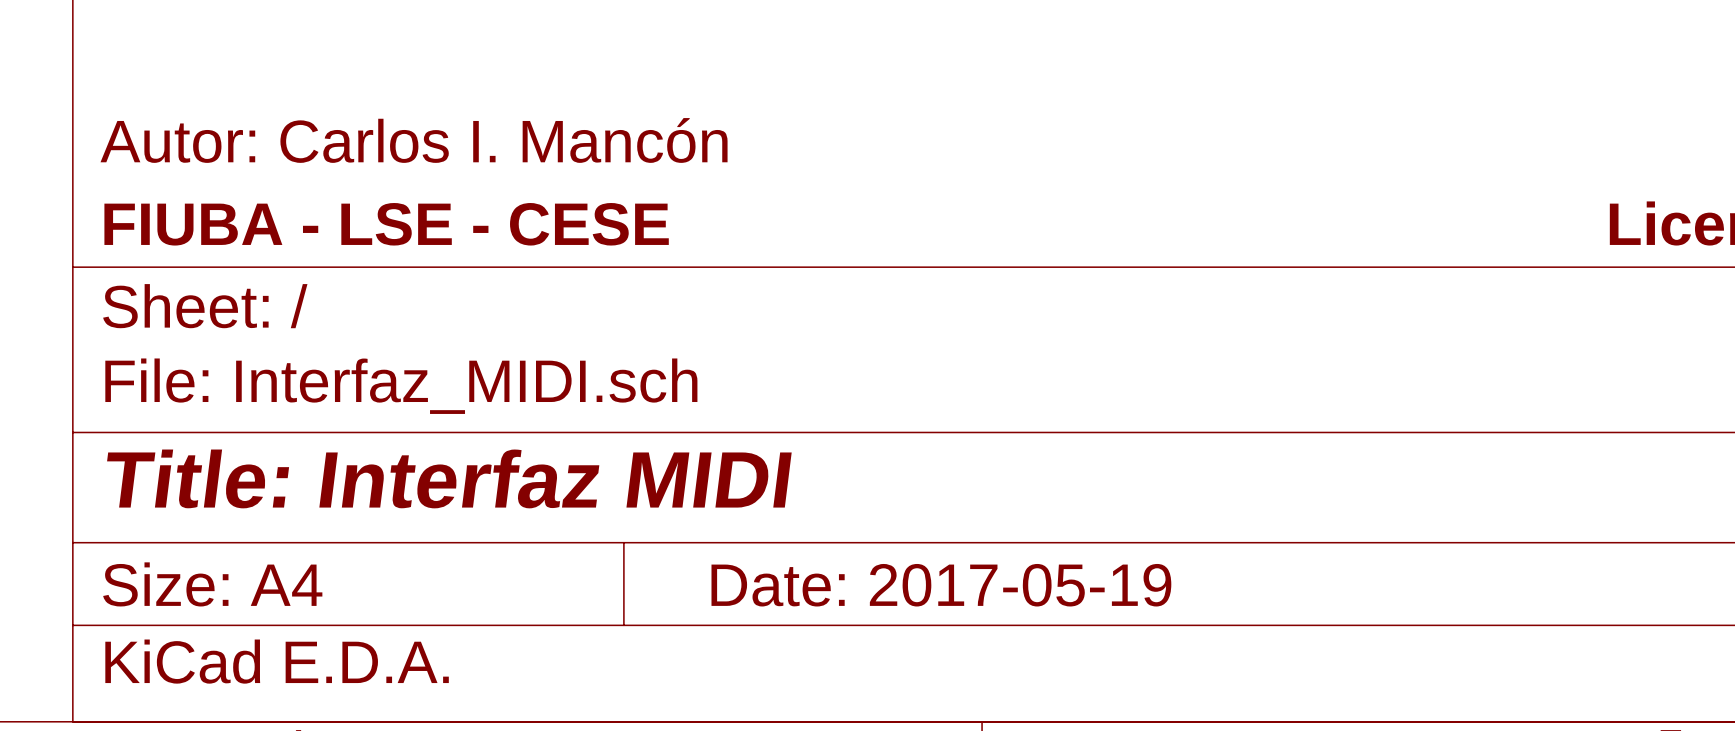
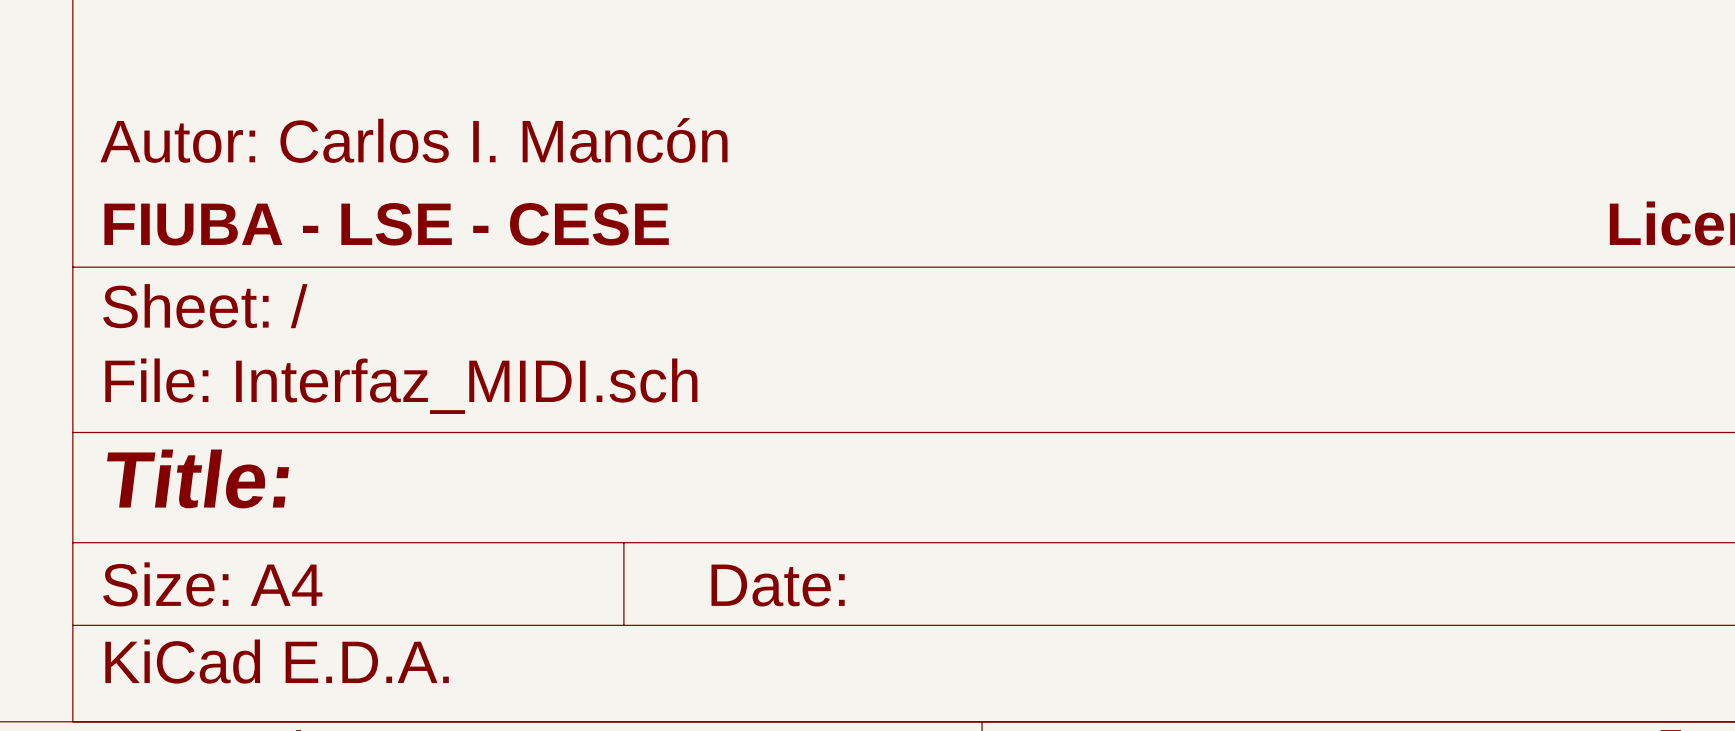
title block: Title: Interfaz MIDI (449, 478) -> Title: (198, 478)
title block: Date: 2017-05-19 (941, 585) -> Date: (778, 585)

